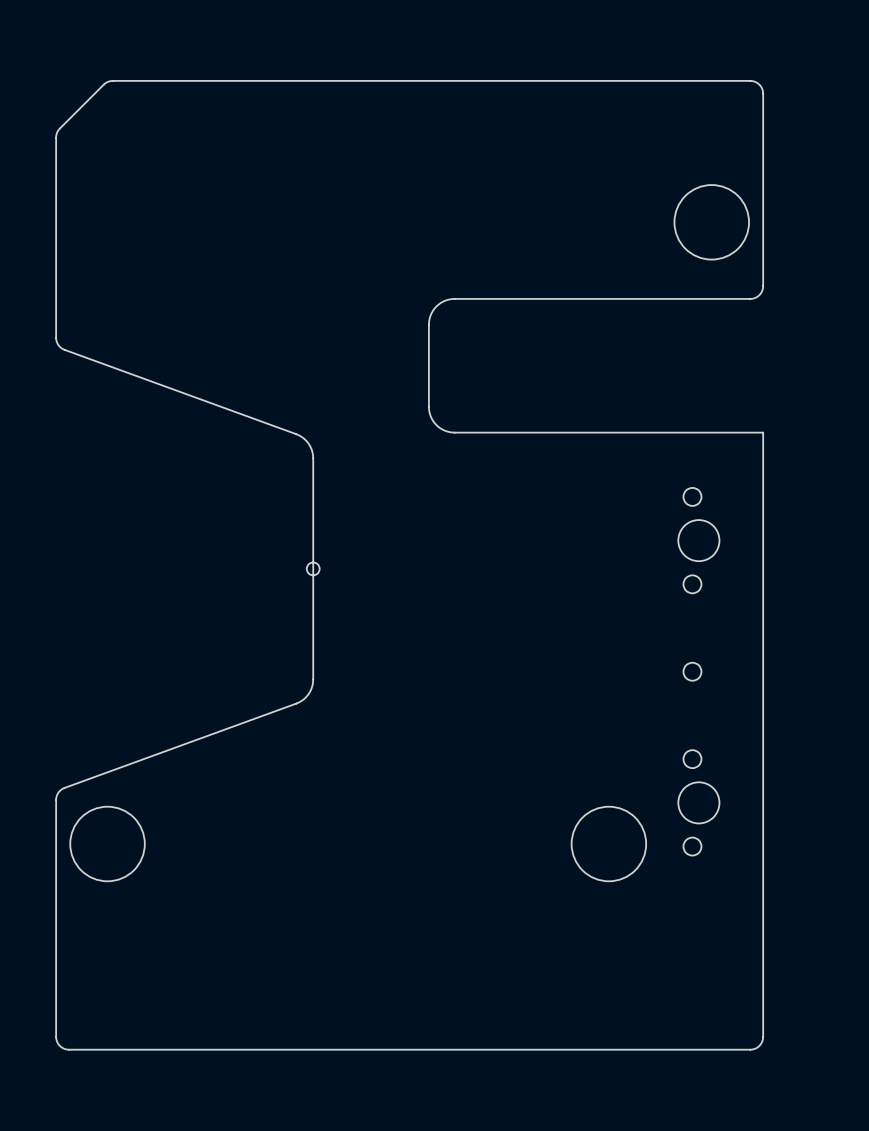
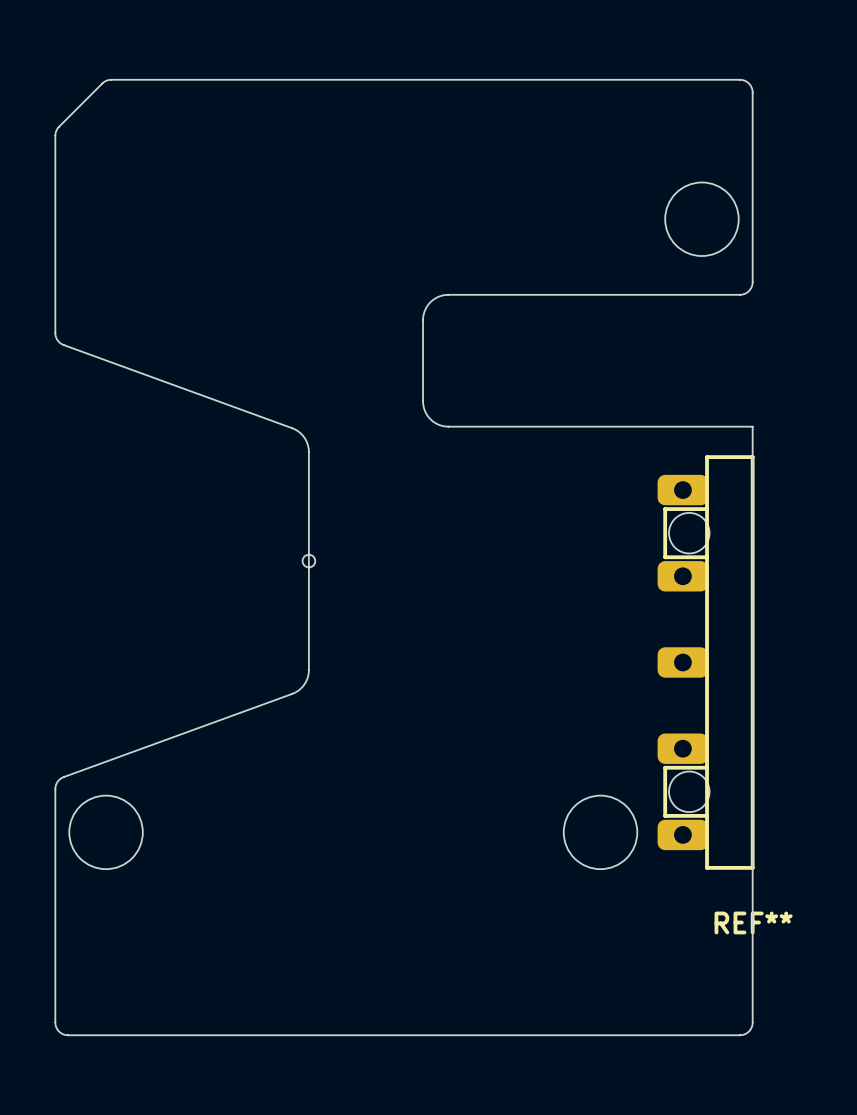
round board edge: [683, 487, 702, 507] -> none
round board edge: [678, 519, 720, 562] -> none
round board edge: [683, 575, 702, 594] -> none
round board edge: [683, 662, 702, 681] -> none
REF**: none -> (706, 662)
round board edge: [683, 750, 702, 769] -> none
round board edge: [678, 782, 720, 824] -> none
round board edge: [683, 837, 702, 856] -> none

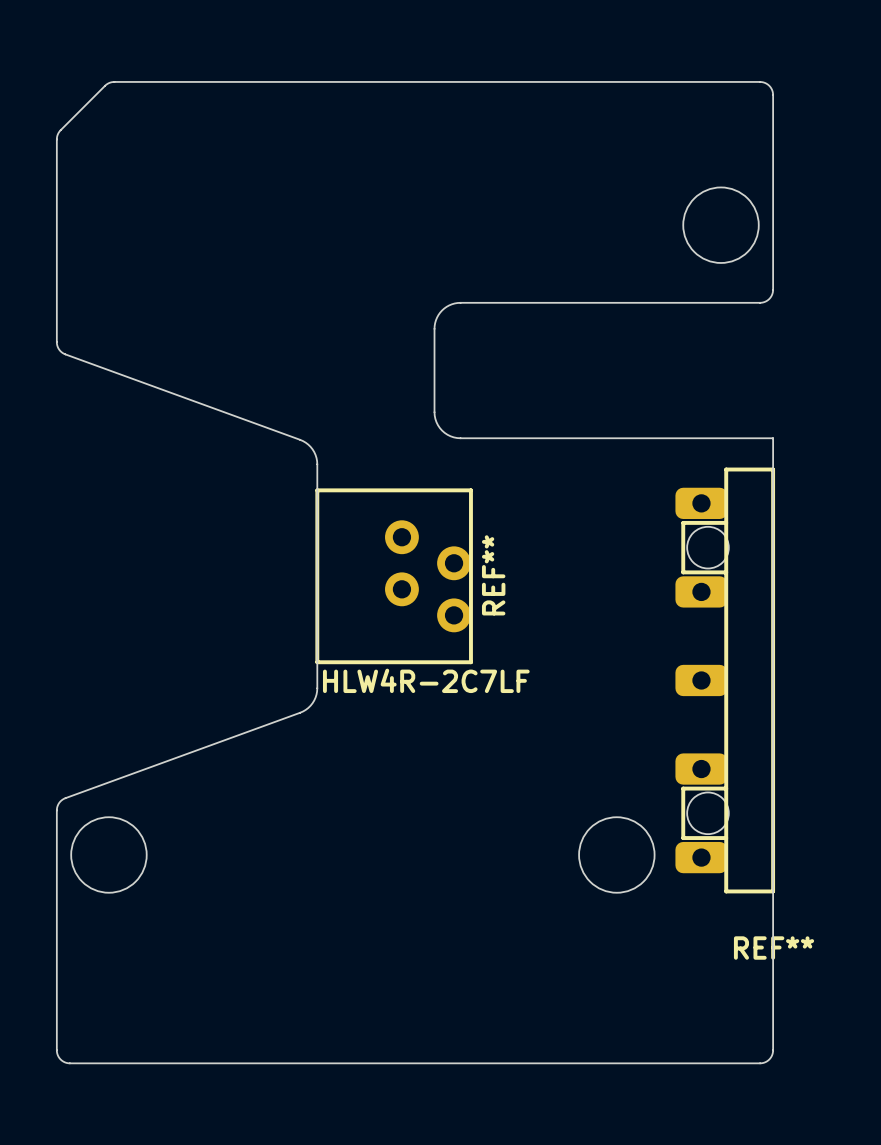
round board edge: [302, 554, 316, 568] -> none
REF**: none -> HLW4R-2C7LF (394, 576)

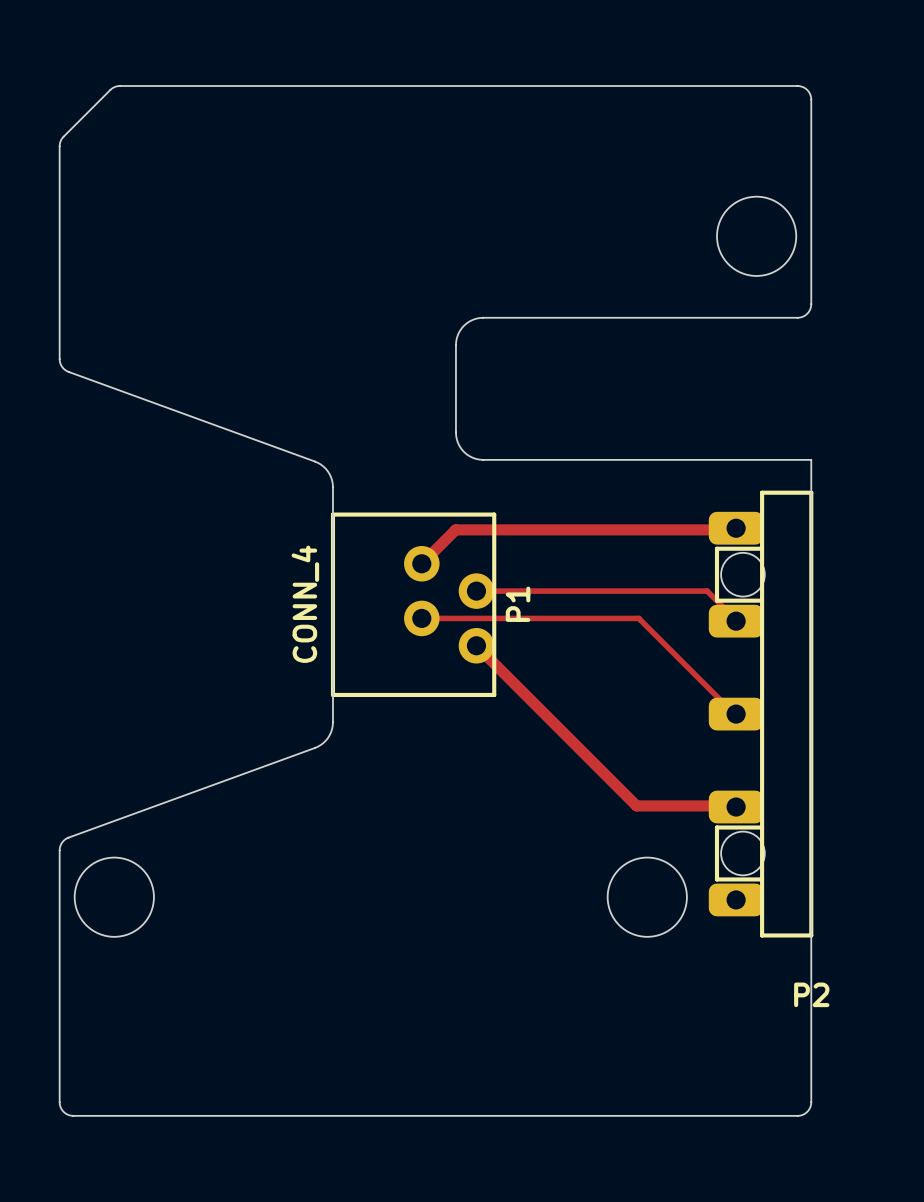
track: none -> (736, 529) (455, 529) (421, 563)
track: none -> (476, 591) (707, 591) (736, 620)
REF** name: REF** (493, 575) -> P1 (518, 604)
track: none -> (421, 618) (638, 618) (736, 715)
track: none -> (476, 645) (636, 805) (736, 805)
REF** value: HLW4R-2C7LF (426, 680) -> CONN_4 (305, 604)
REF** name: REF** (774, 948) -> P2 (811, 994)

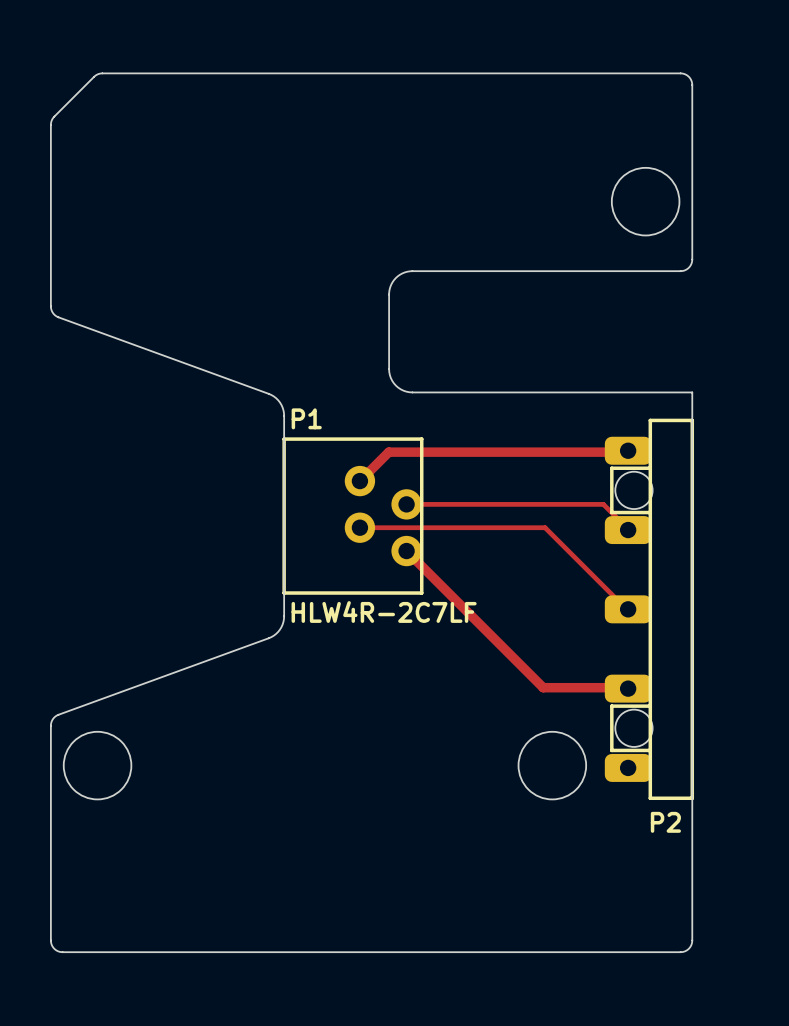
P1 value: CONN_4 (305, 604) -> HLW4R-2C7LF (384, 612)
P1 name rotation: 0° (518, 604) -> 90° clockwise (306, 418)
P1 name position: P1 (518, 604) -> P1 (306, 418)
P2 name position: P2 (811, 994) -> P2 (665, 822)

